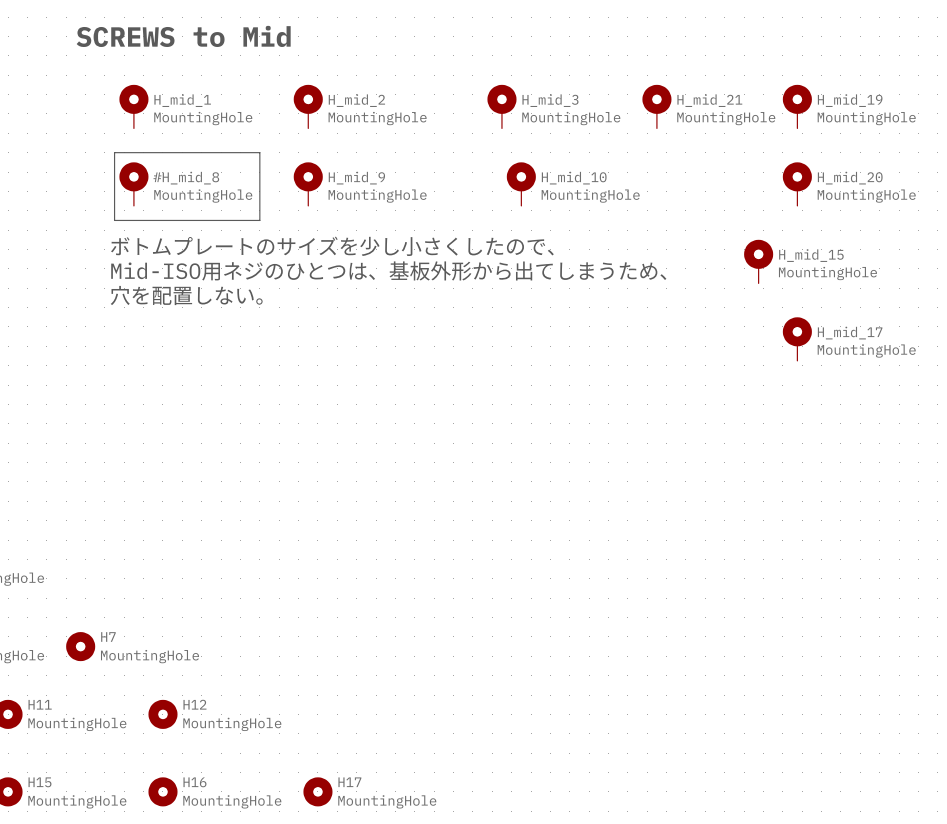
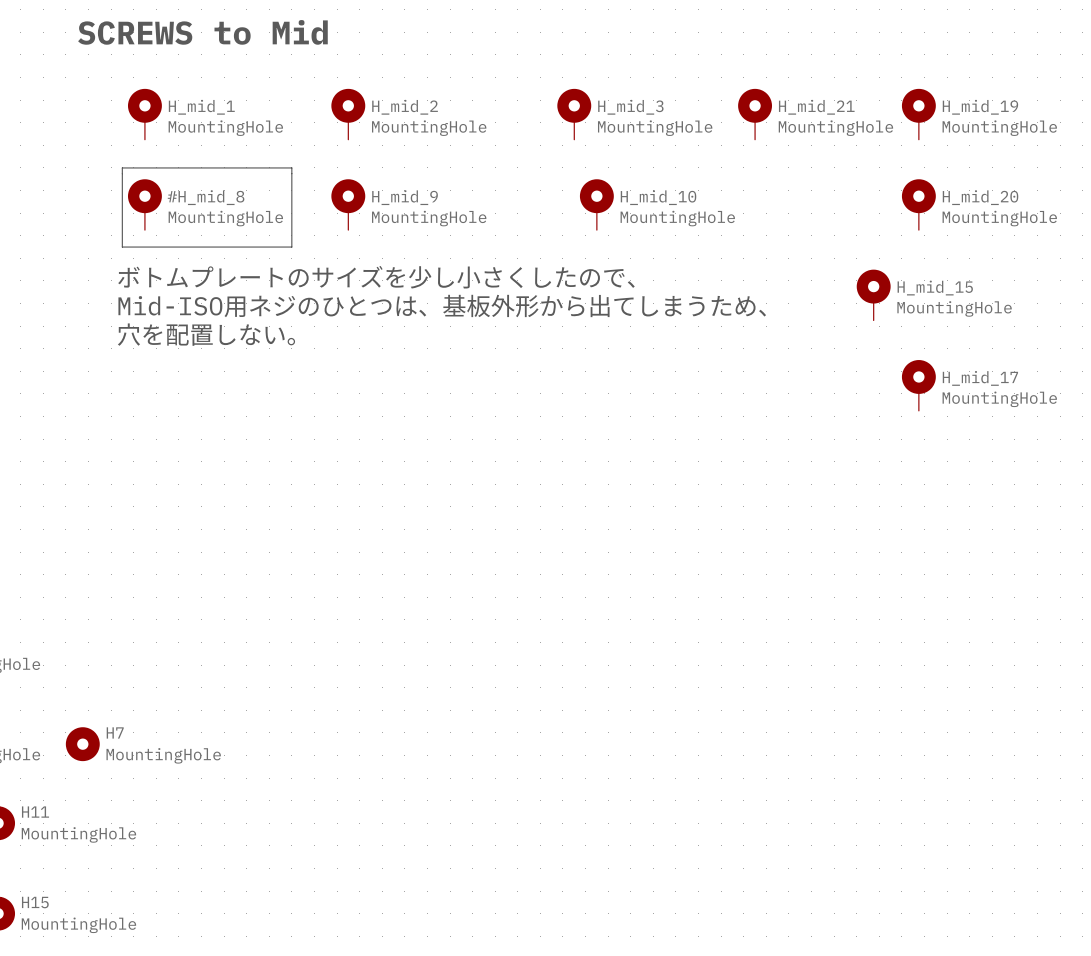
H12: MountingHole (162, 714) -> none
H16: MountingHole (162, 791) -> none
H17: MountingHole (317, 791) -> none

